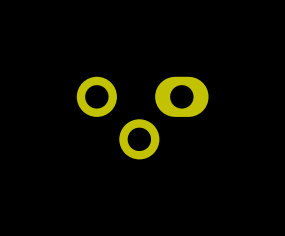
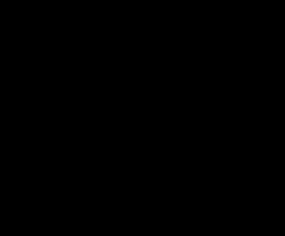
part: (142, 118) -> none

